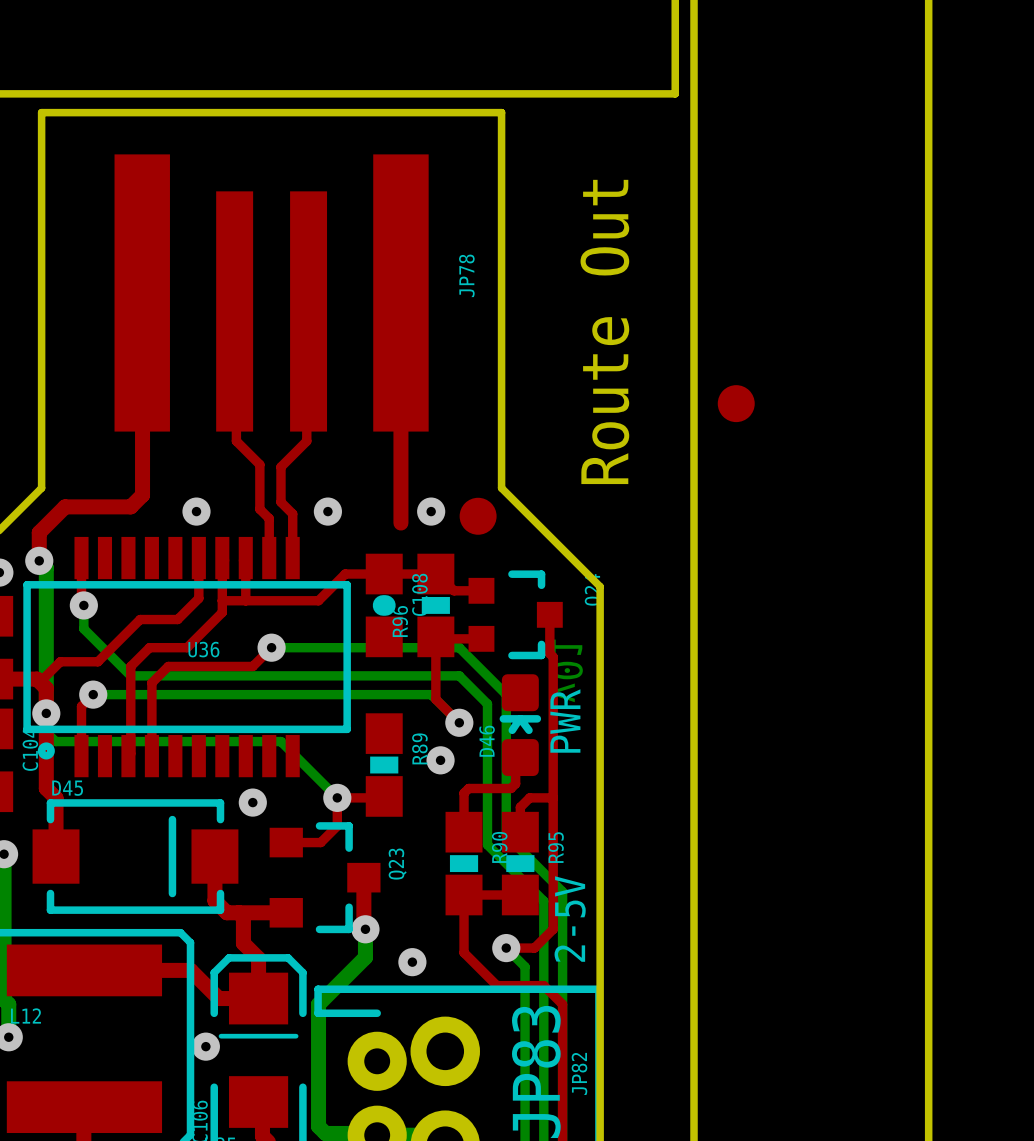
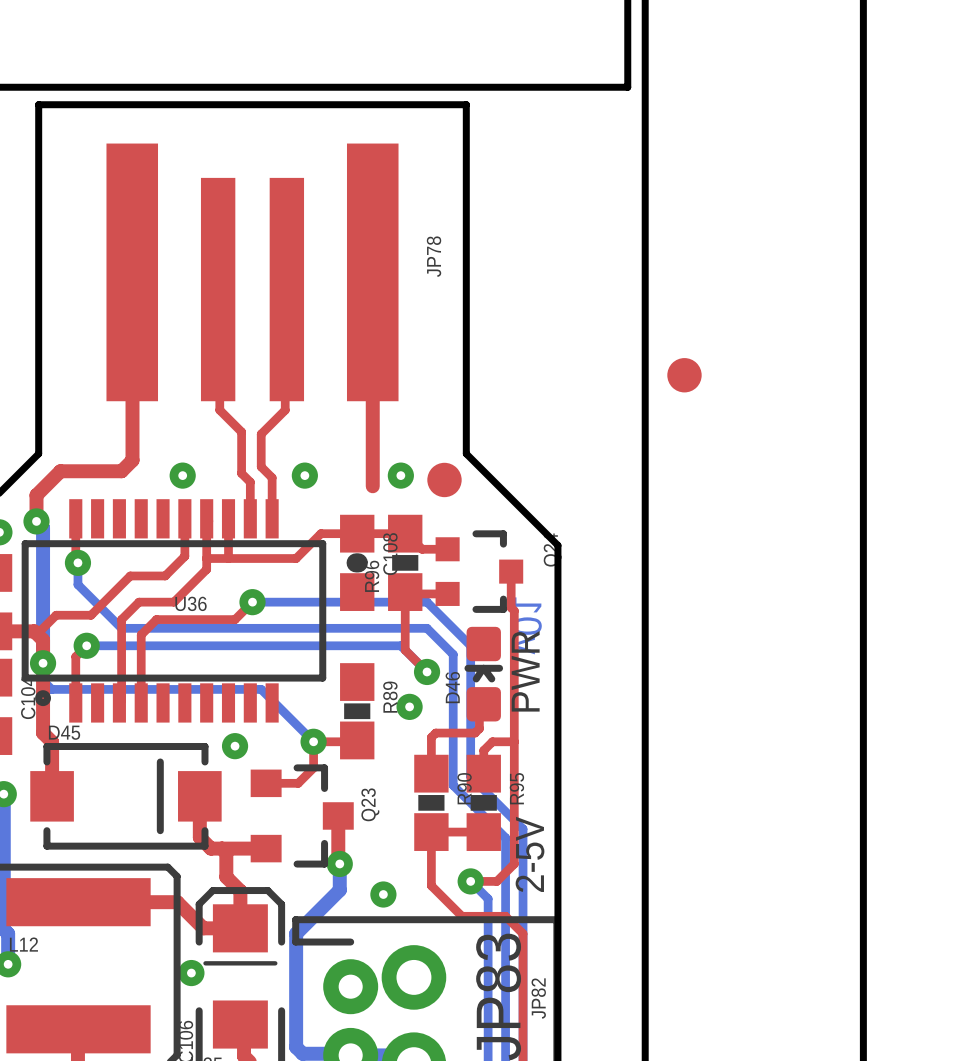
text: Route Out (604, 331) -> none

